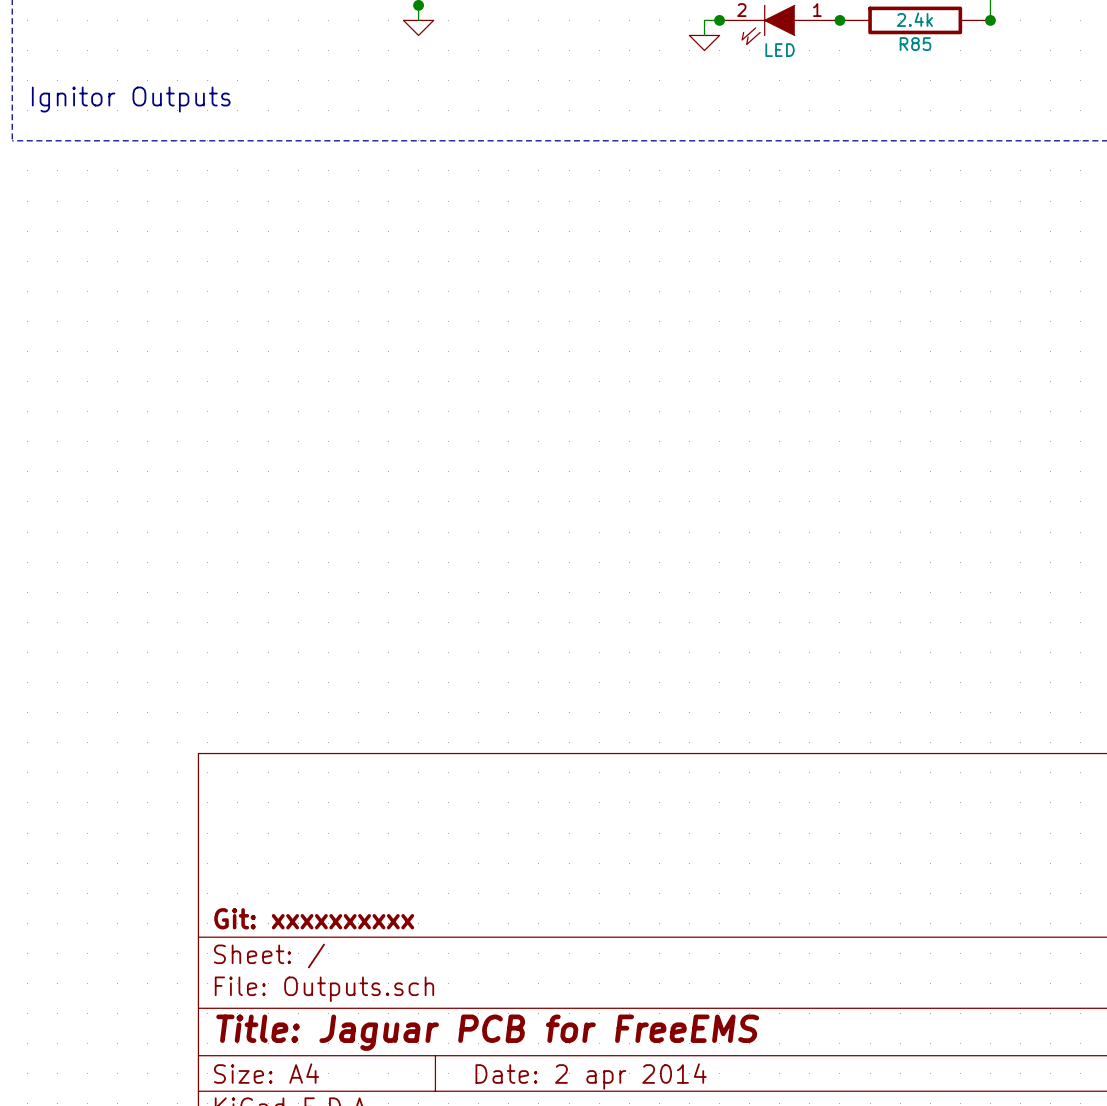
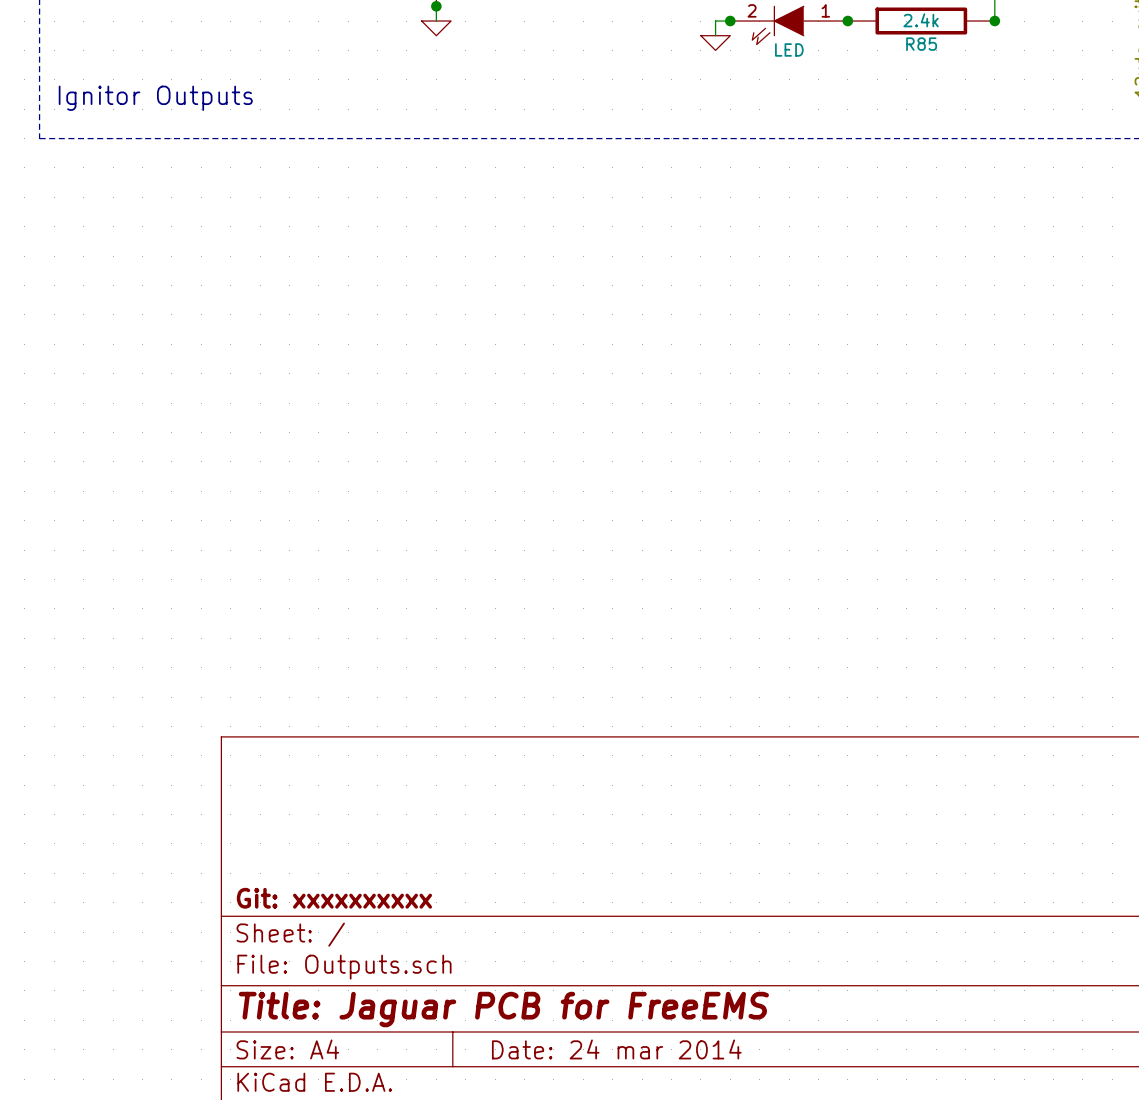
title block: Date: 2 apr 2014 (591, 1076) -> Date: 24 mar 2014 (616, 1049)

